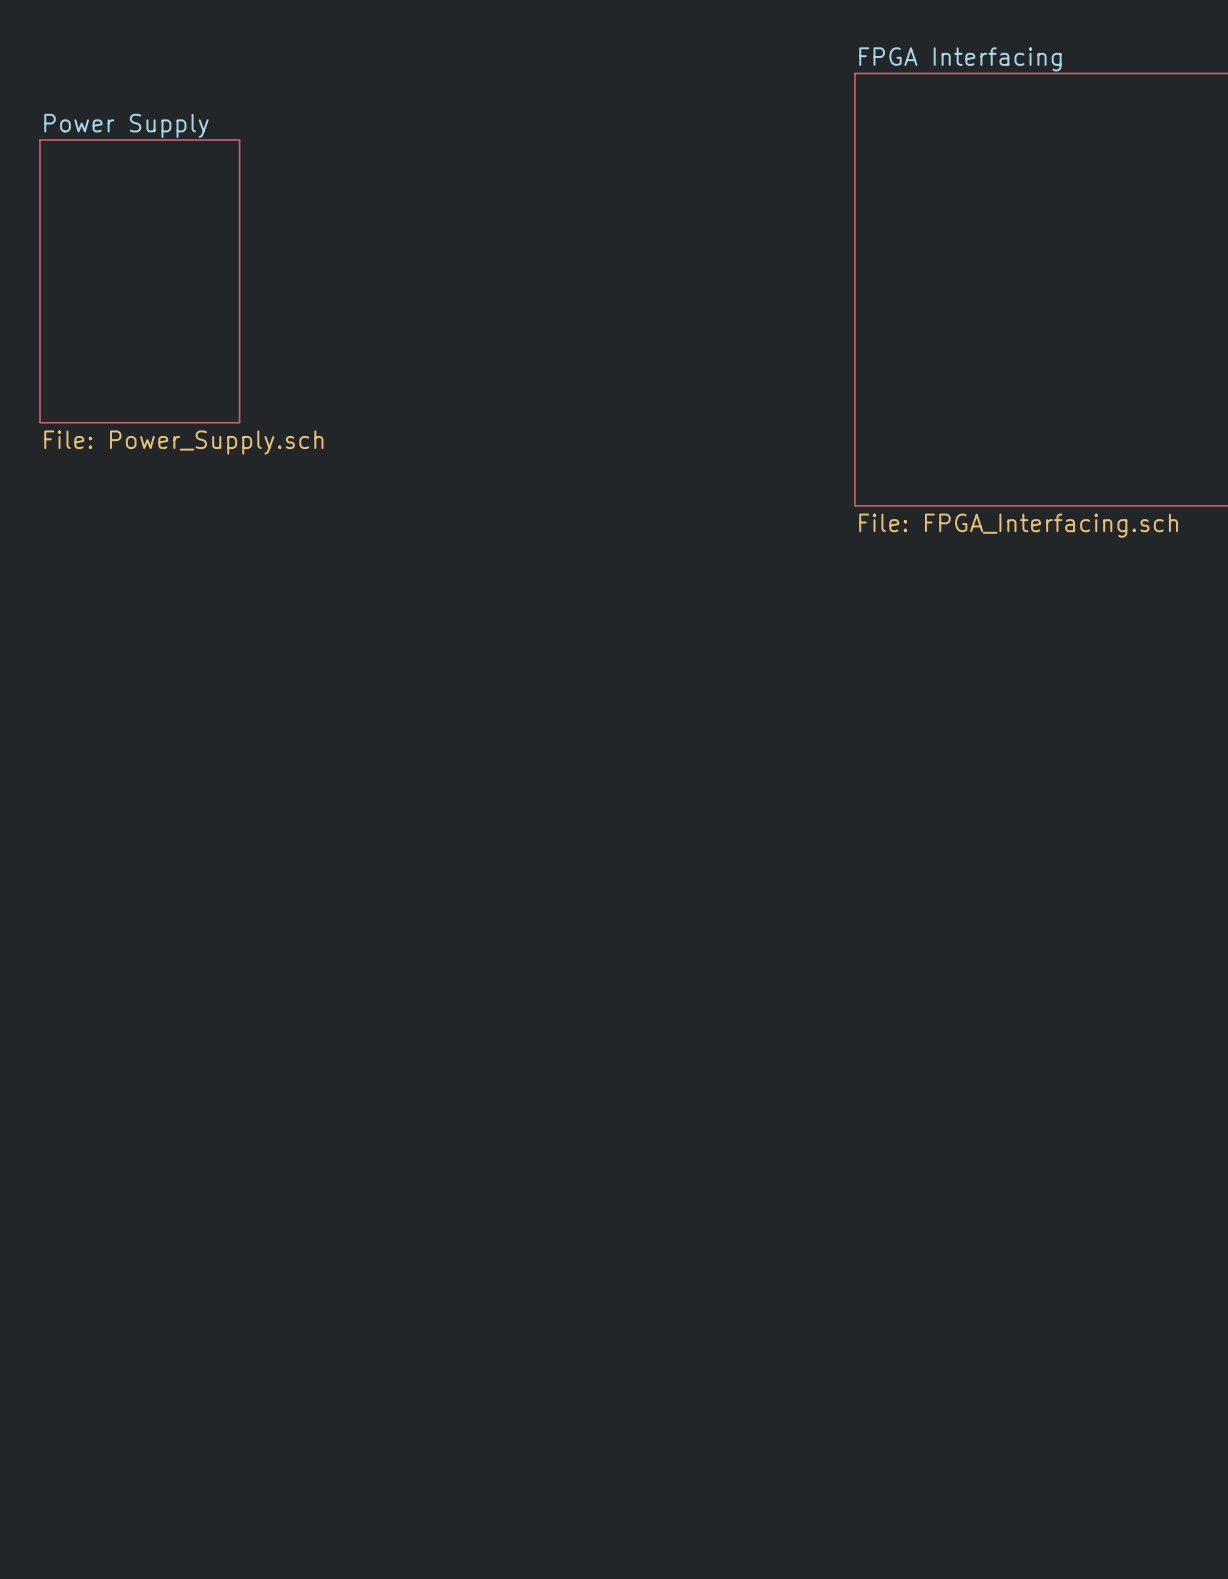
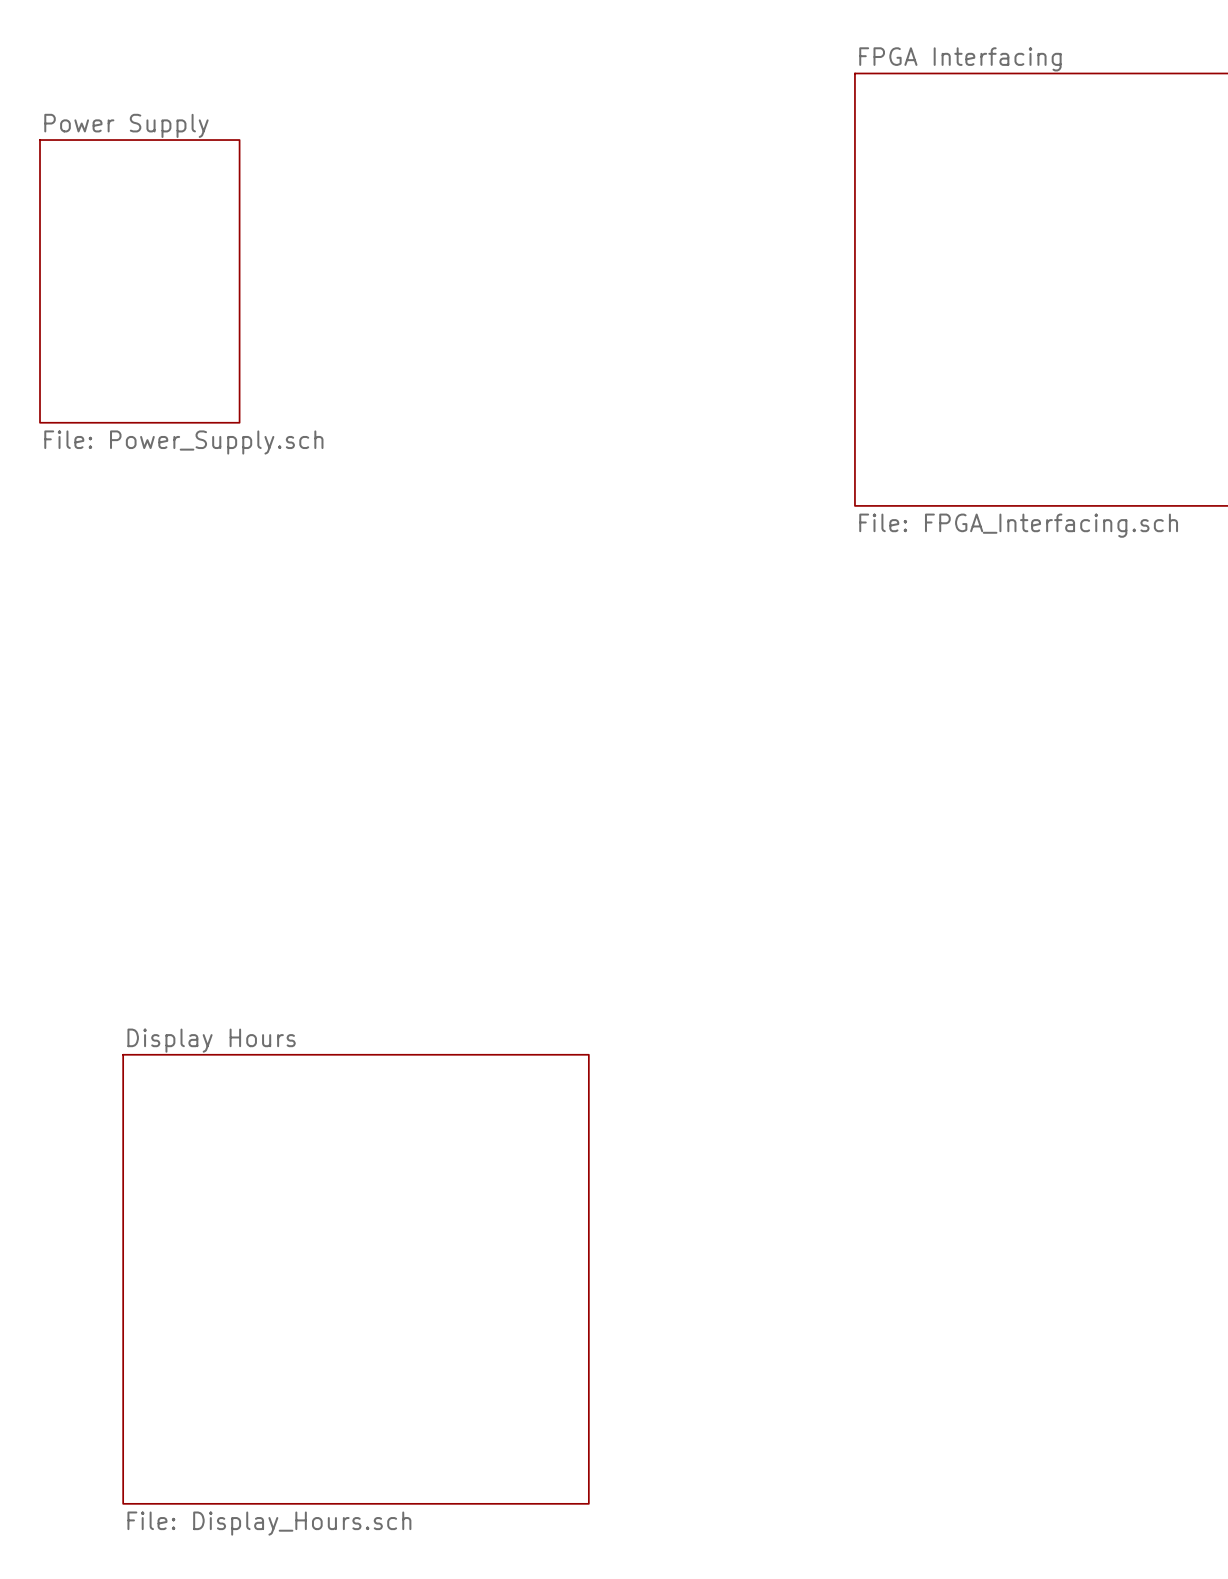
sheet Display Hours: none -> File: Display_Hours.sch (356, 1279)

